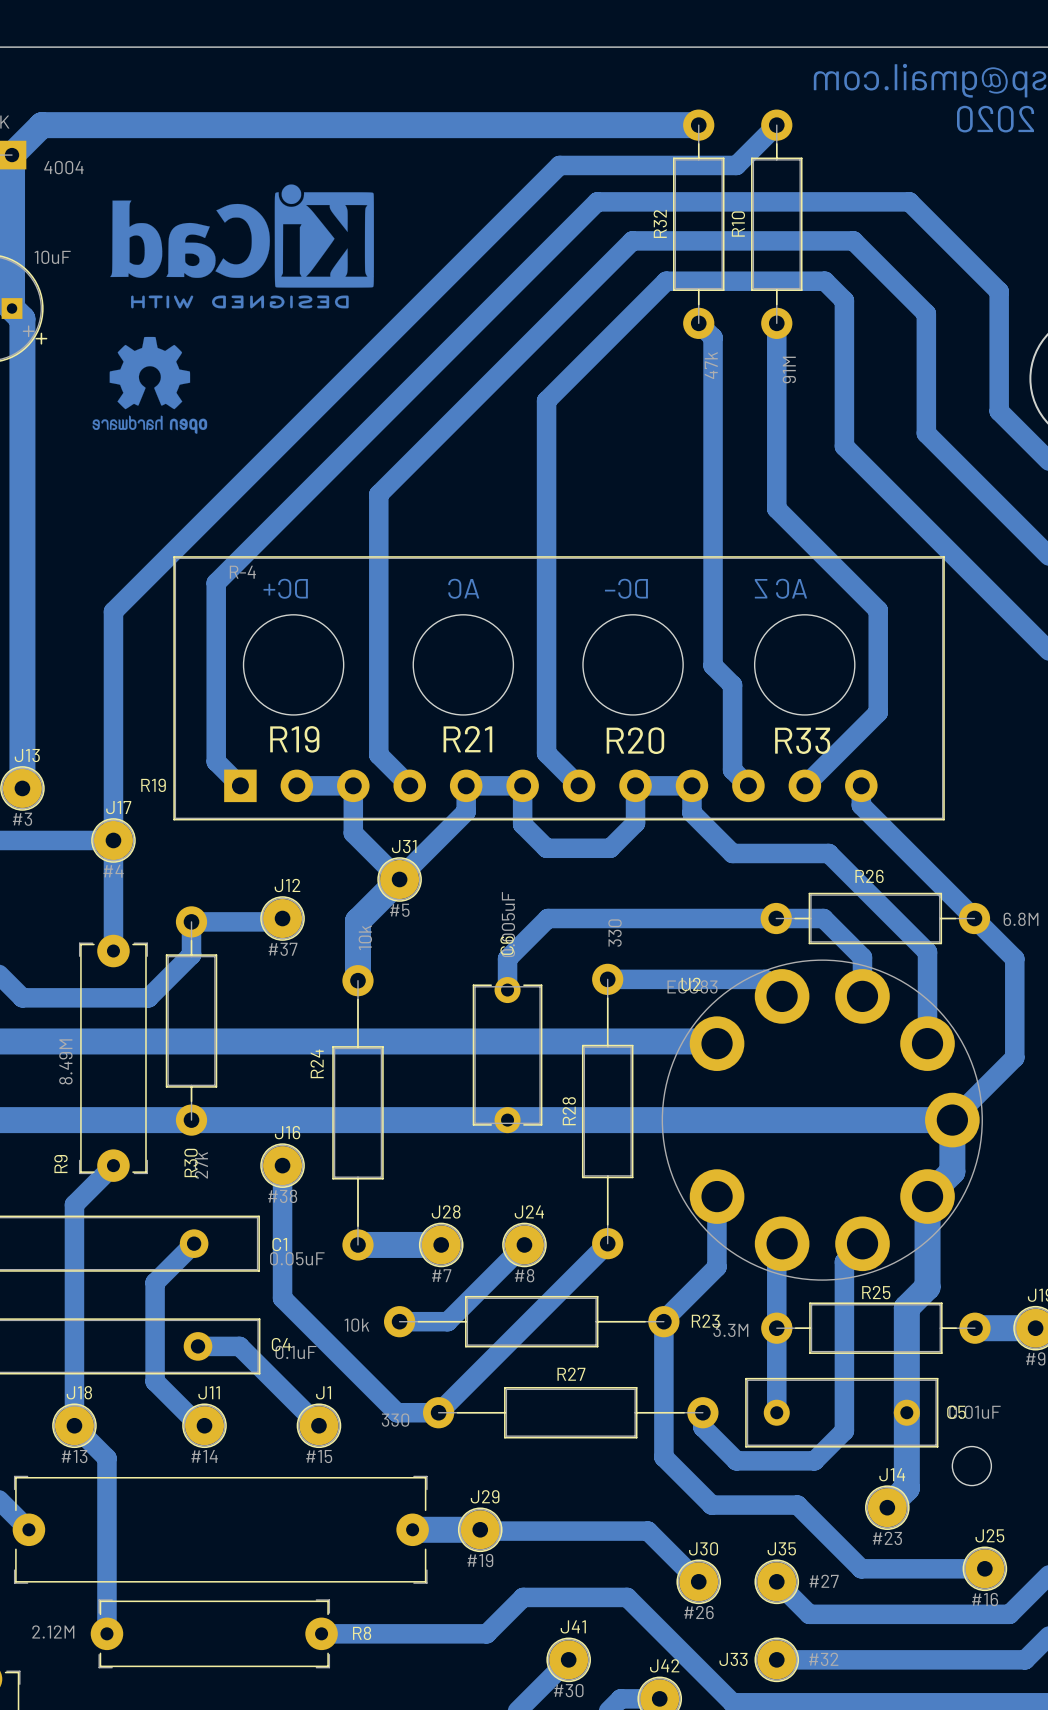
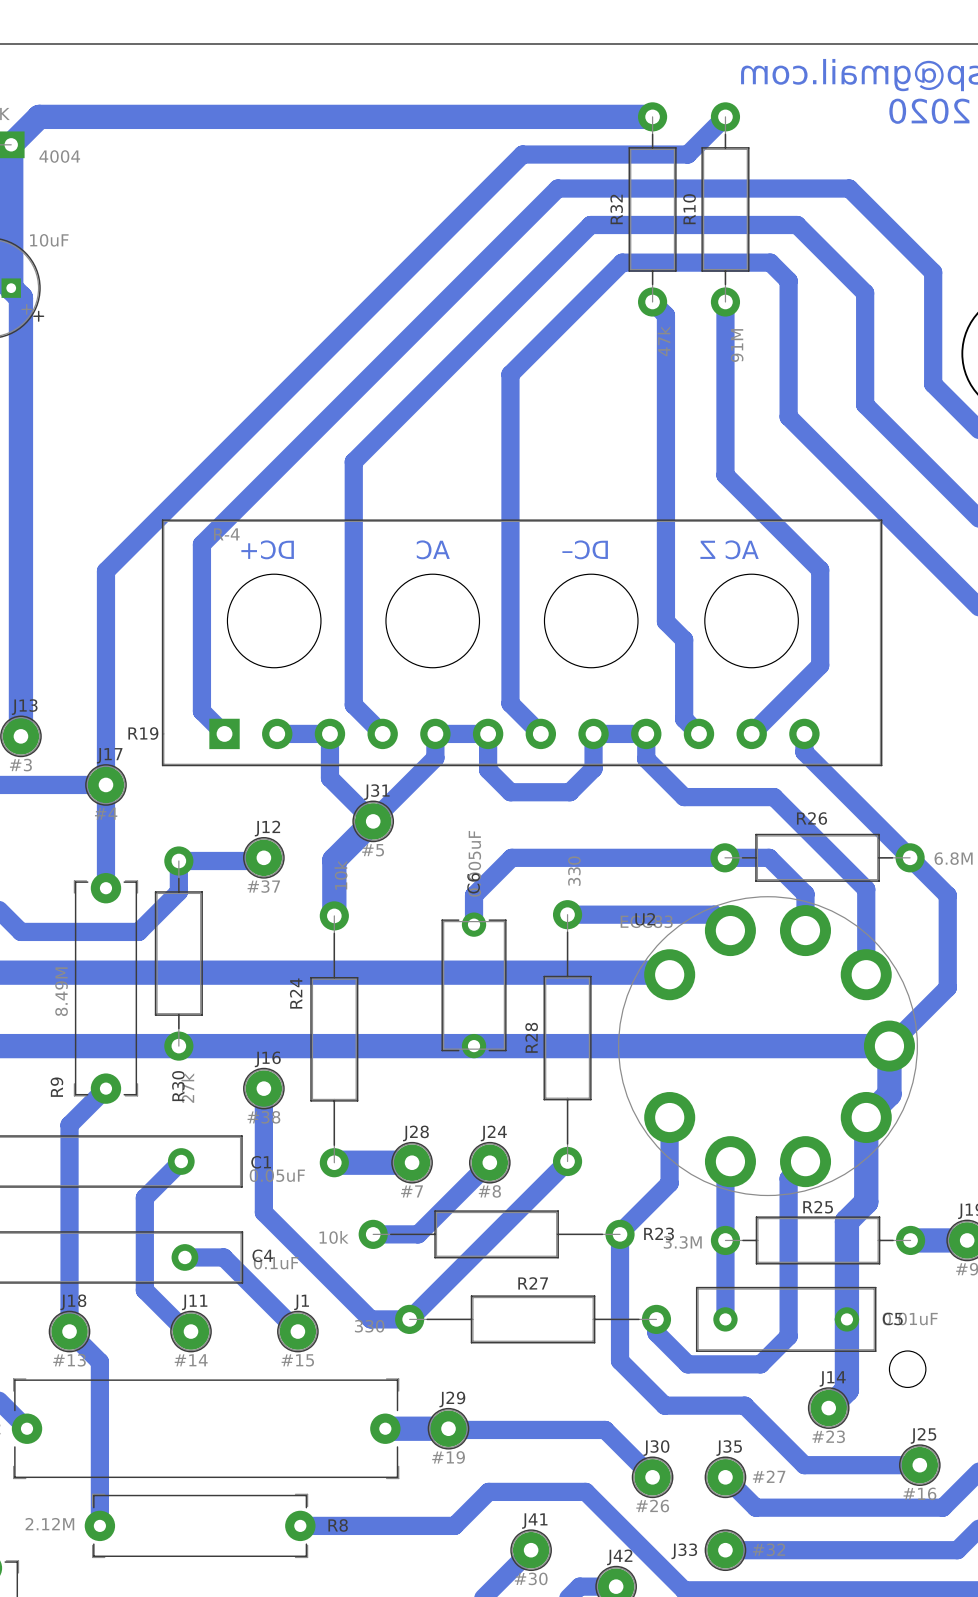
drawing: [110, 184, 374, 309] -> none
drawing: [92, 336, 208, 434] -> none
drawing: [270, 726, 320, 753] -> none
drawing: [443, 726, 493, 753] -> none
drawing: [606, 727, 665, 755] -> none
drawing: [775, 727, 831, 754] -> none

